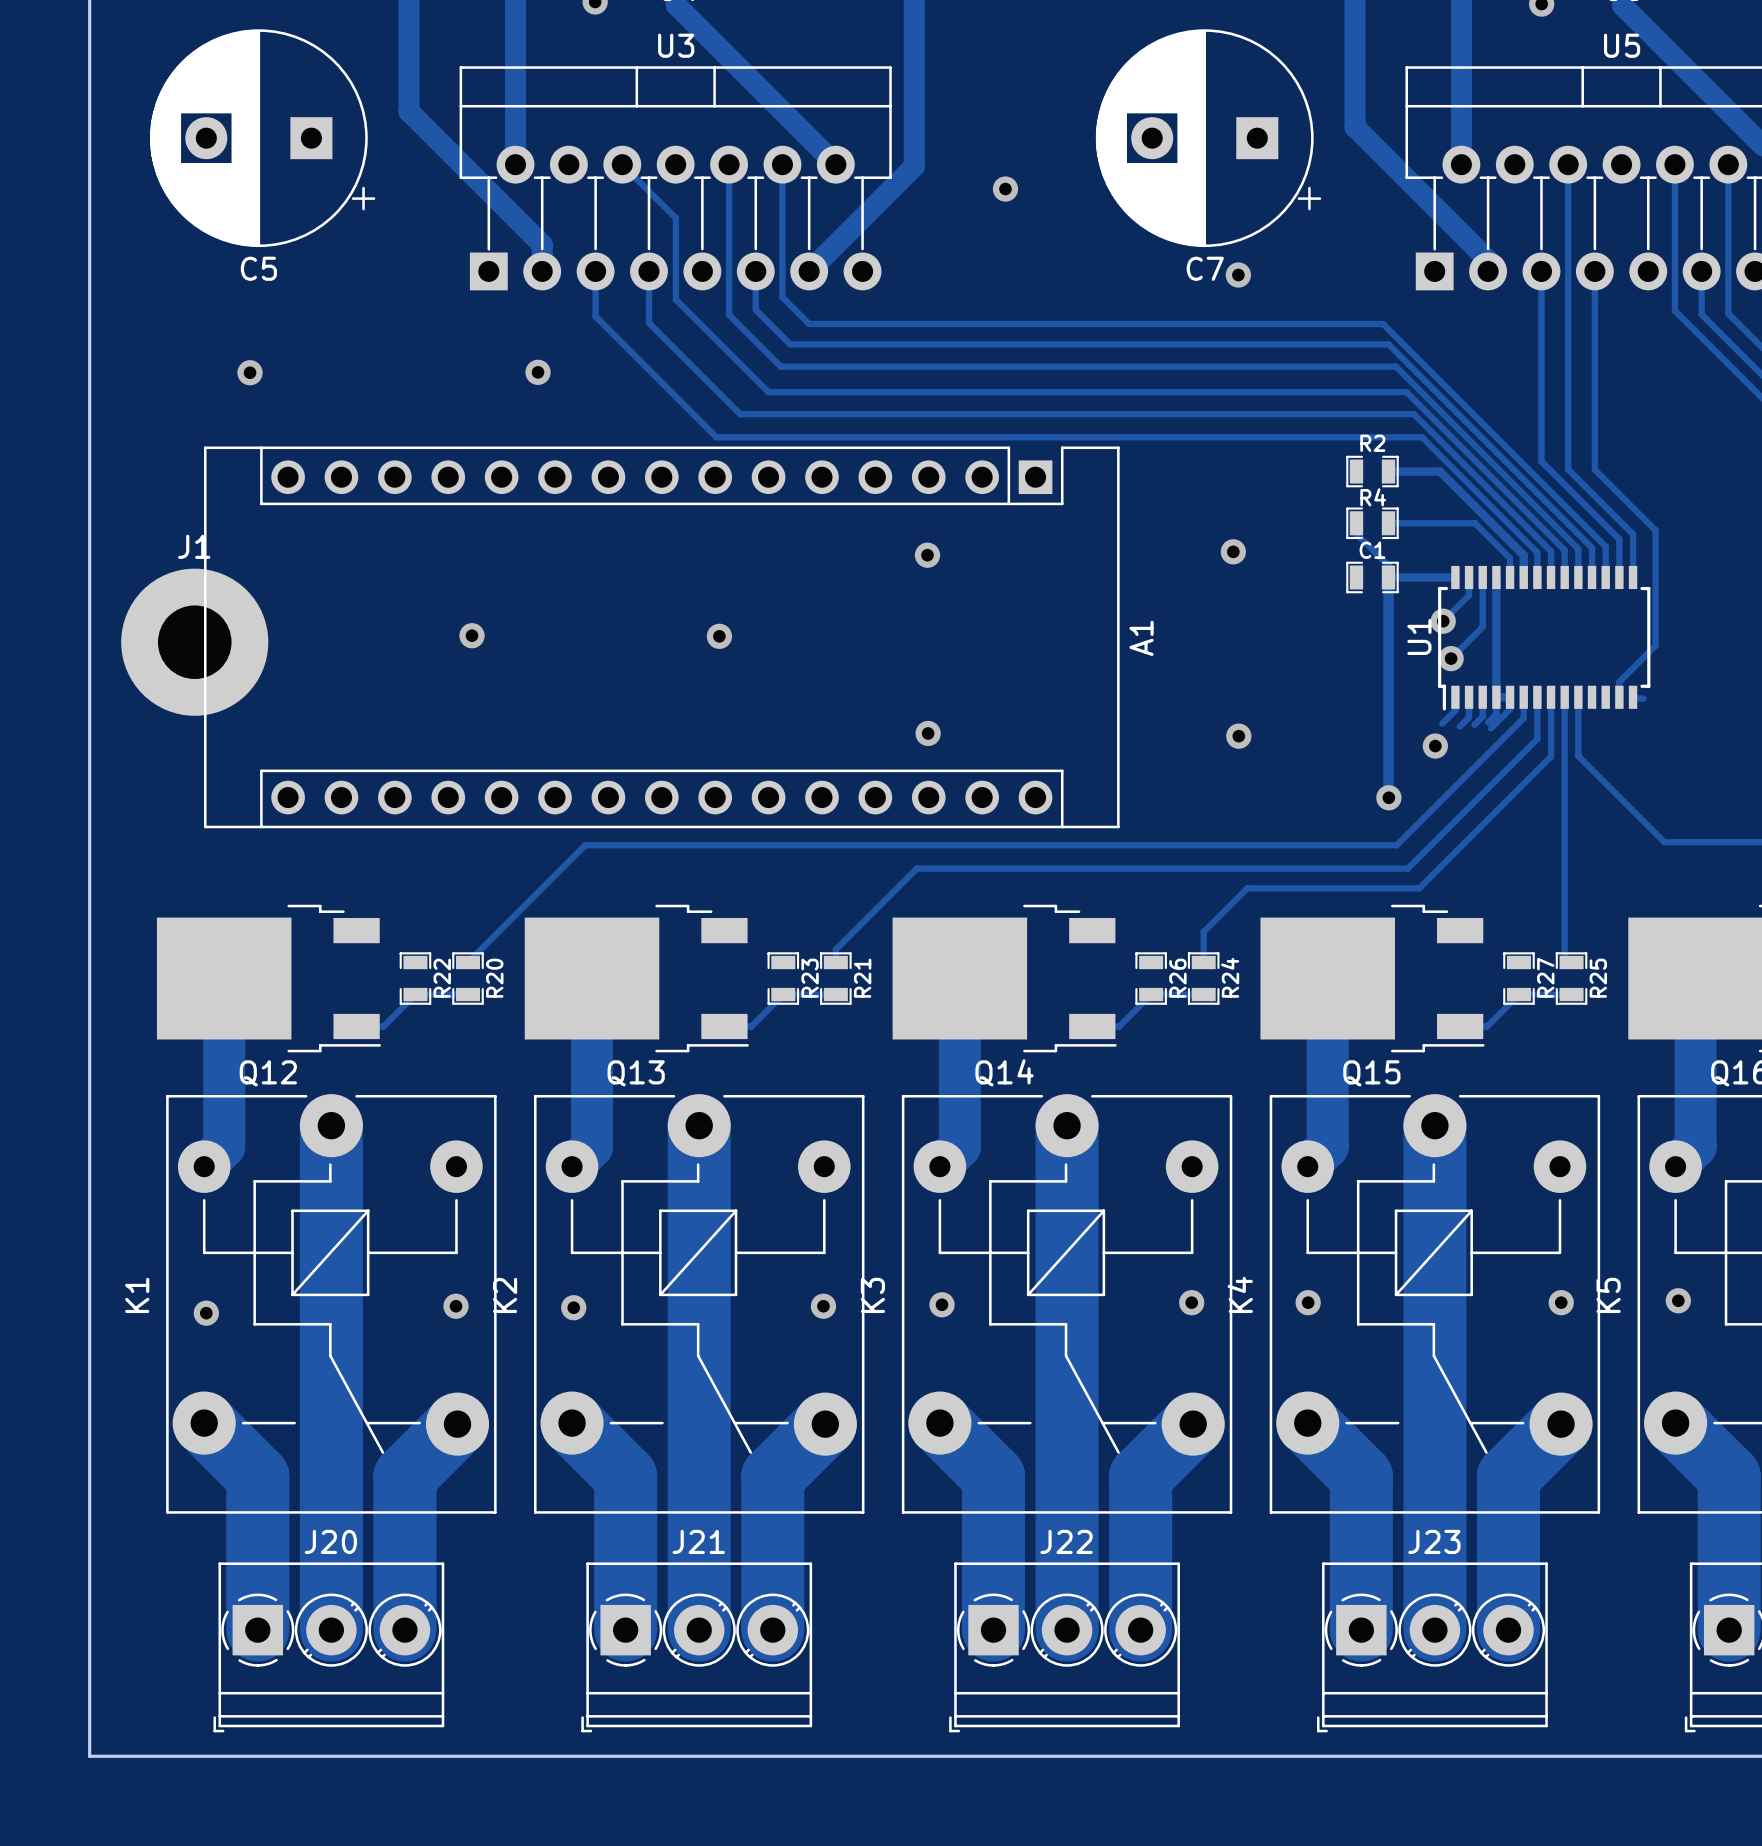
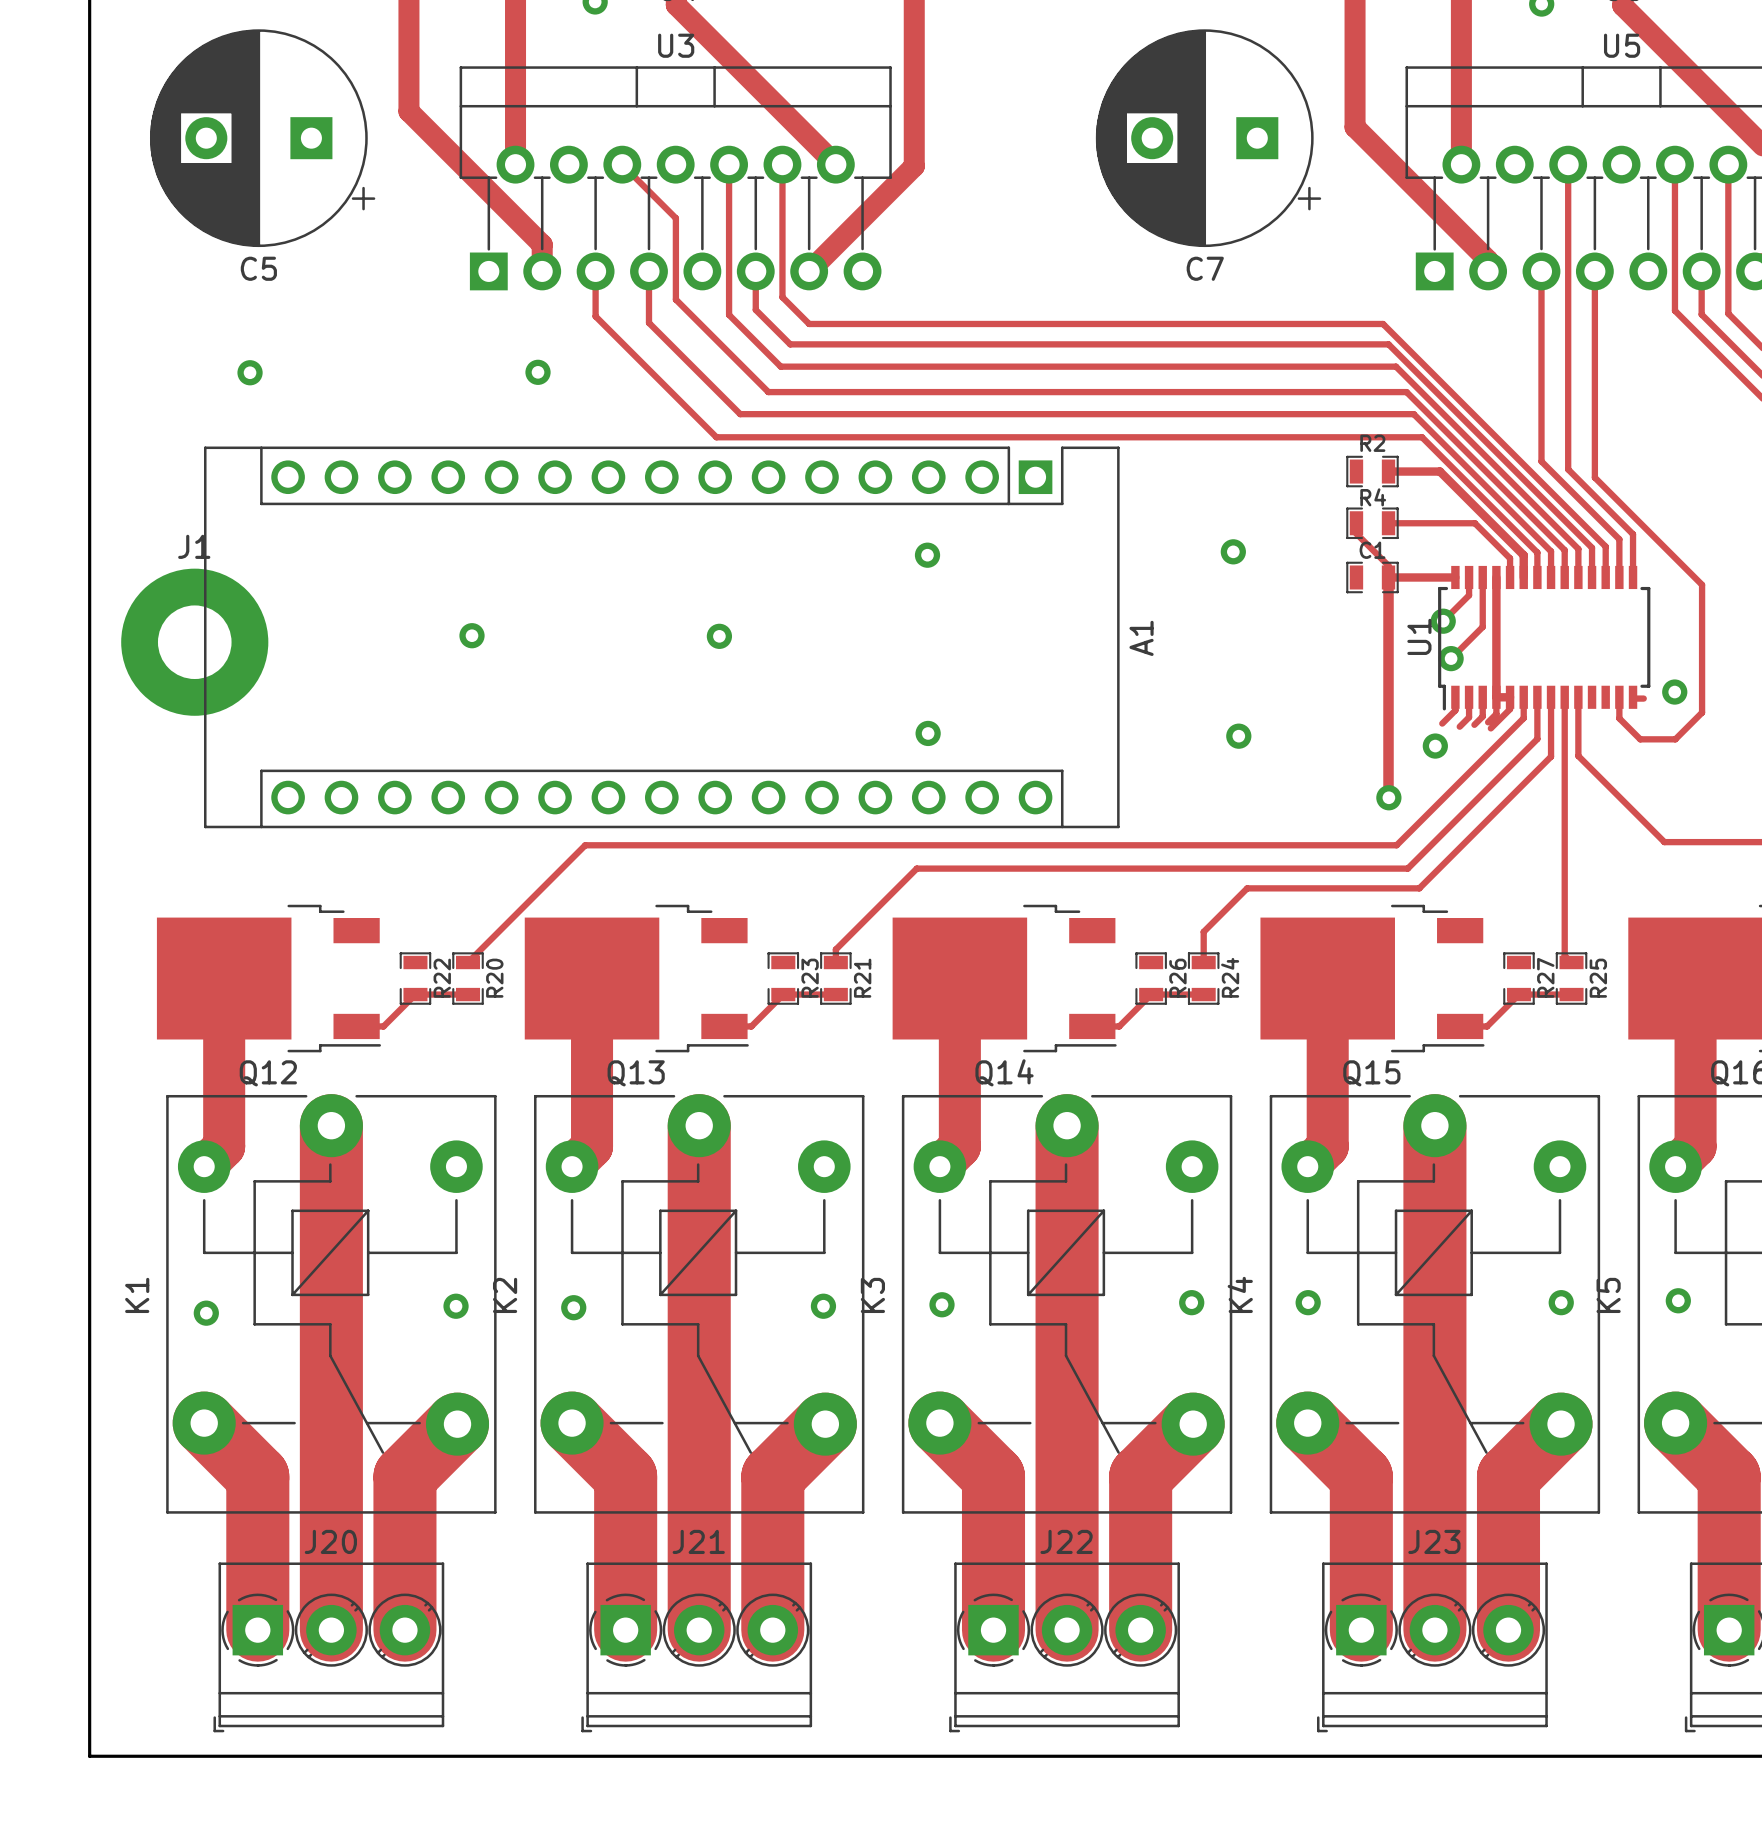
via: (1005, 189) -> none
via: (1238, 275) -> none
track: (1594, 469) (1655, 530) (1655, 645) (1619, 681) (1619, 697) -> (1594, 469) (1594, 477) (1702, 584) (1702, 712) (1675, 739) (1640, 739) (1619, 718) (1619, 697)
via: none -> (1674, 692)

